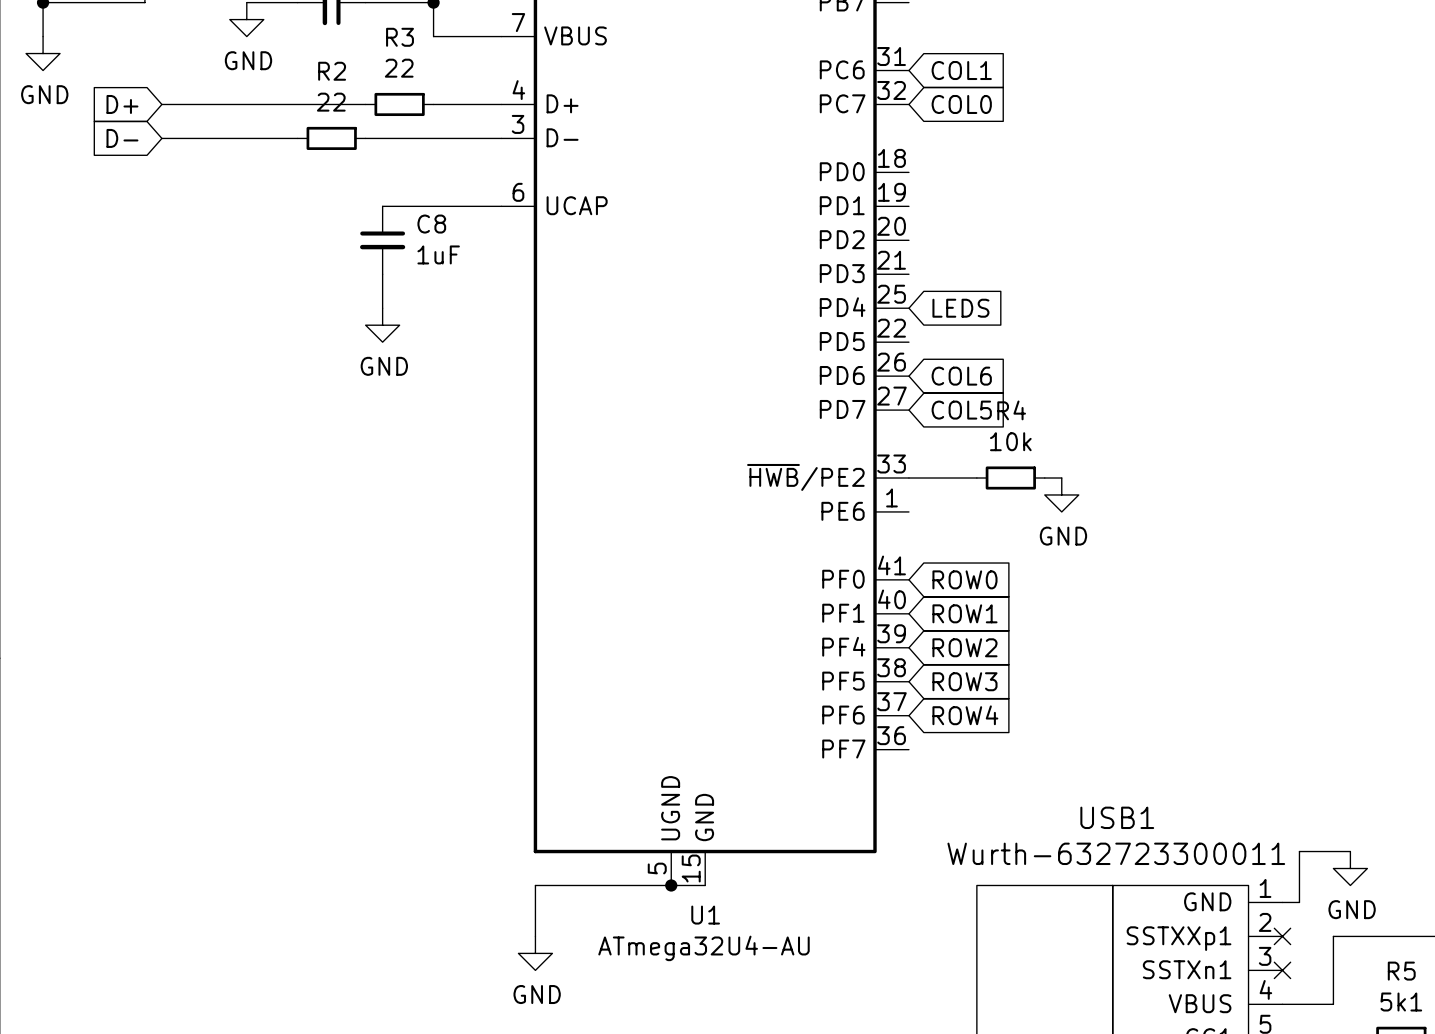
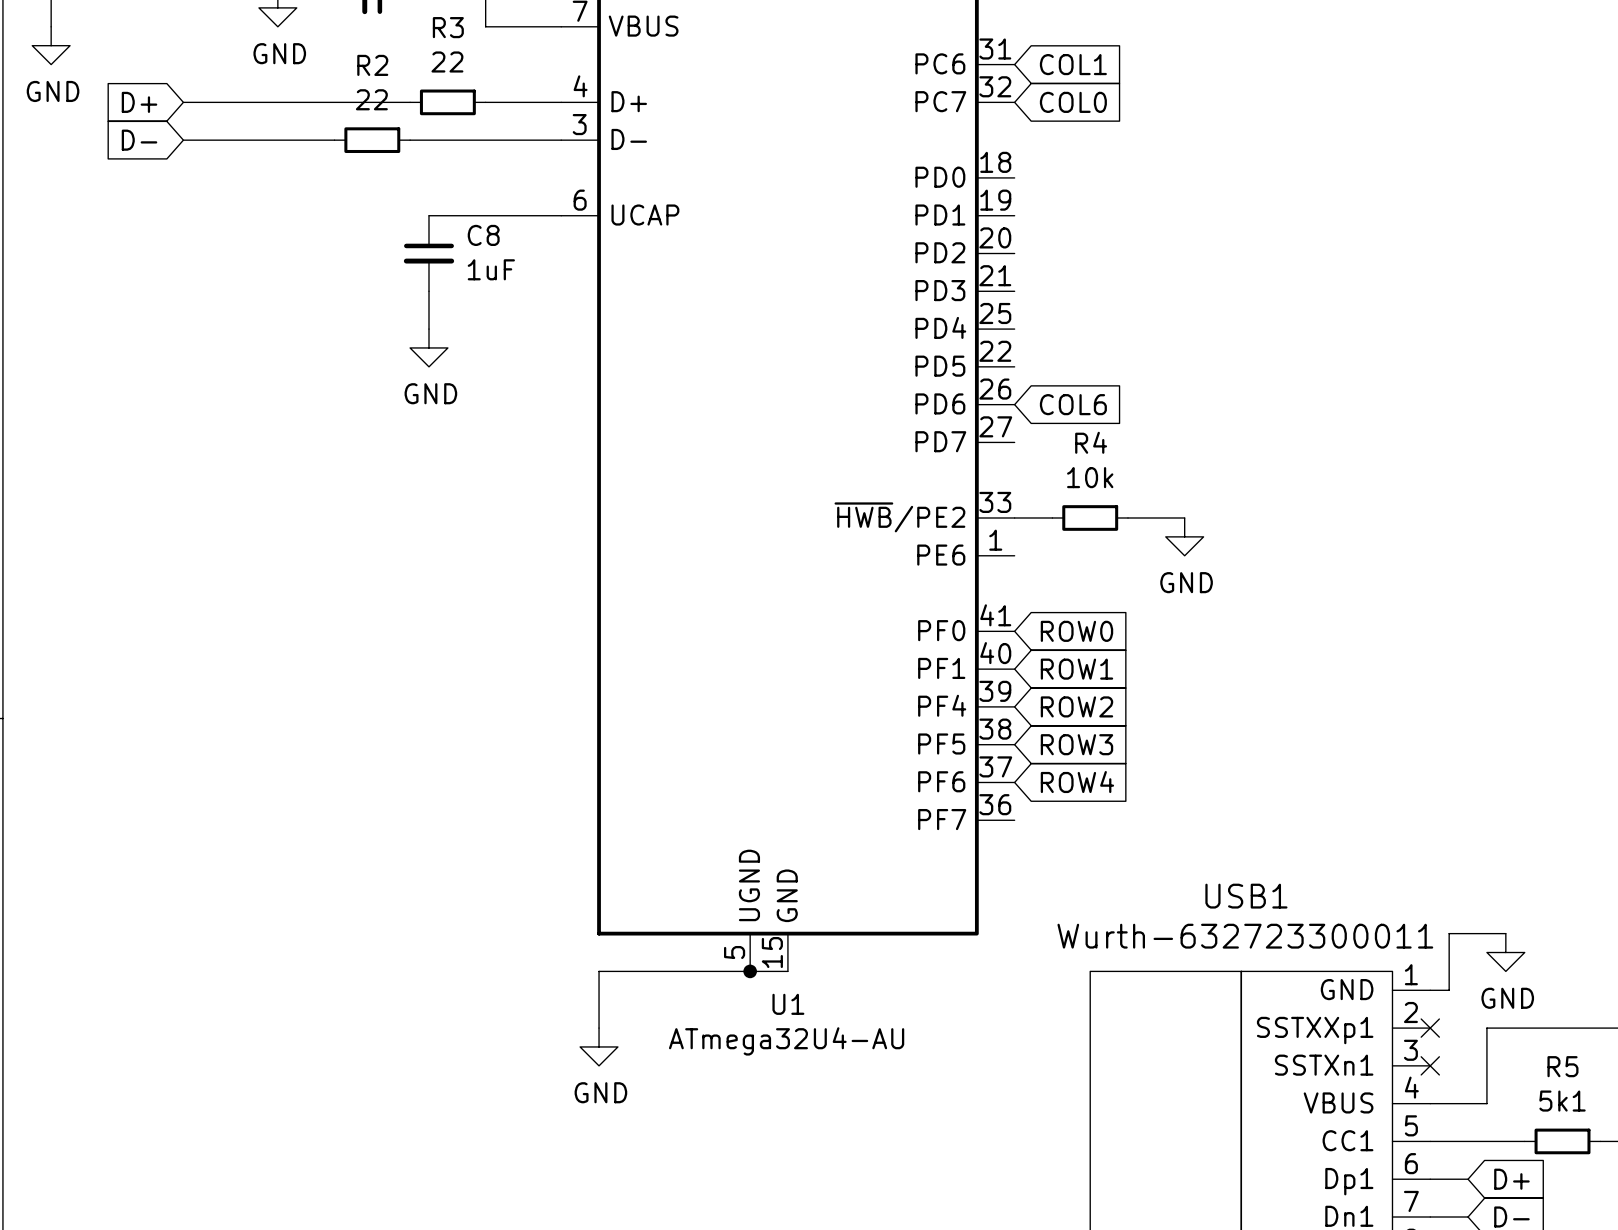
global label: LEDS (960, 308) -> none
global label: COL5 (961, 410) -> none
wire: (942, 478) (976, 478) -> (1128, 517) (1165, 517)
R4 position: (1010, 478) -> (1090, 517)

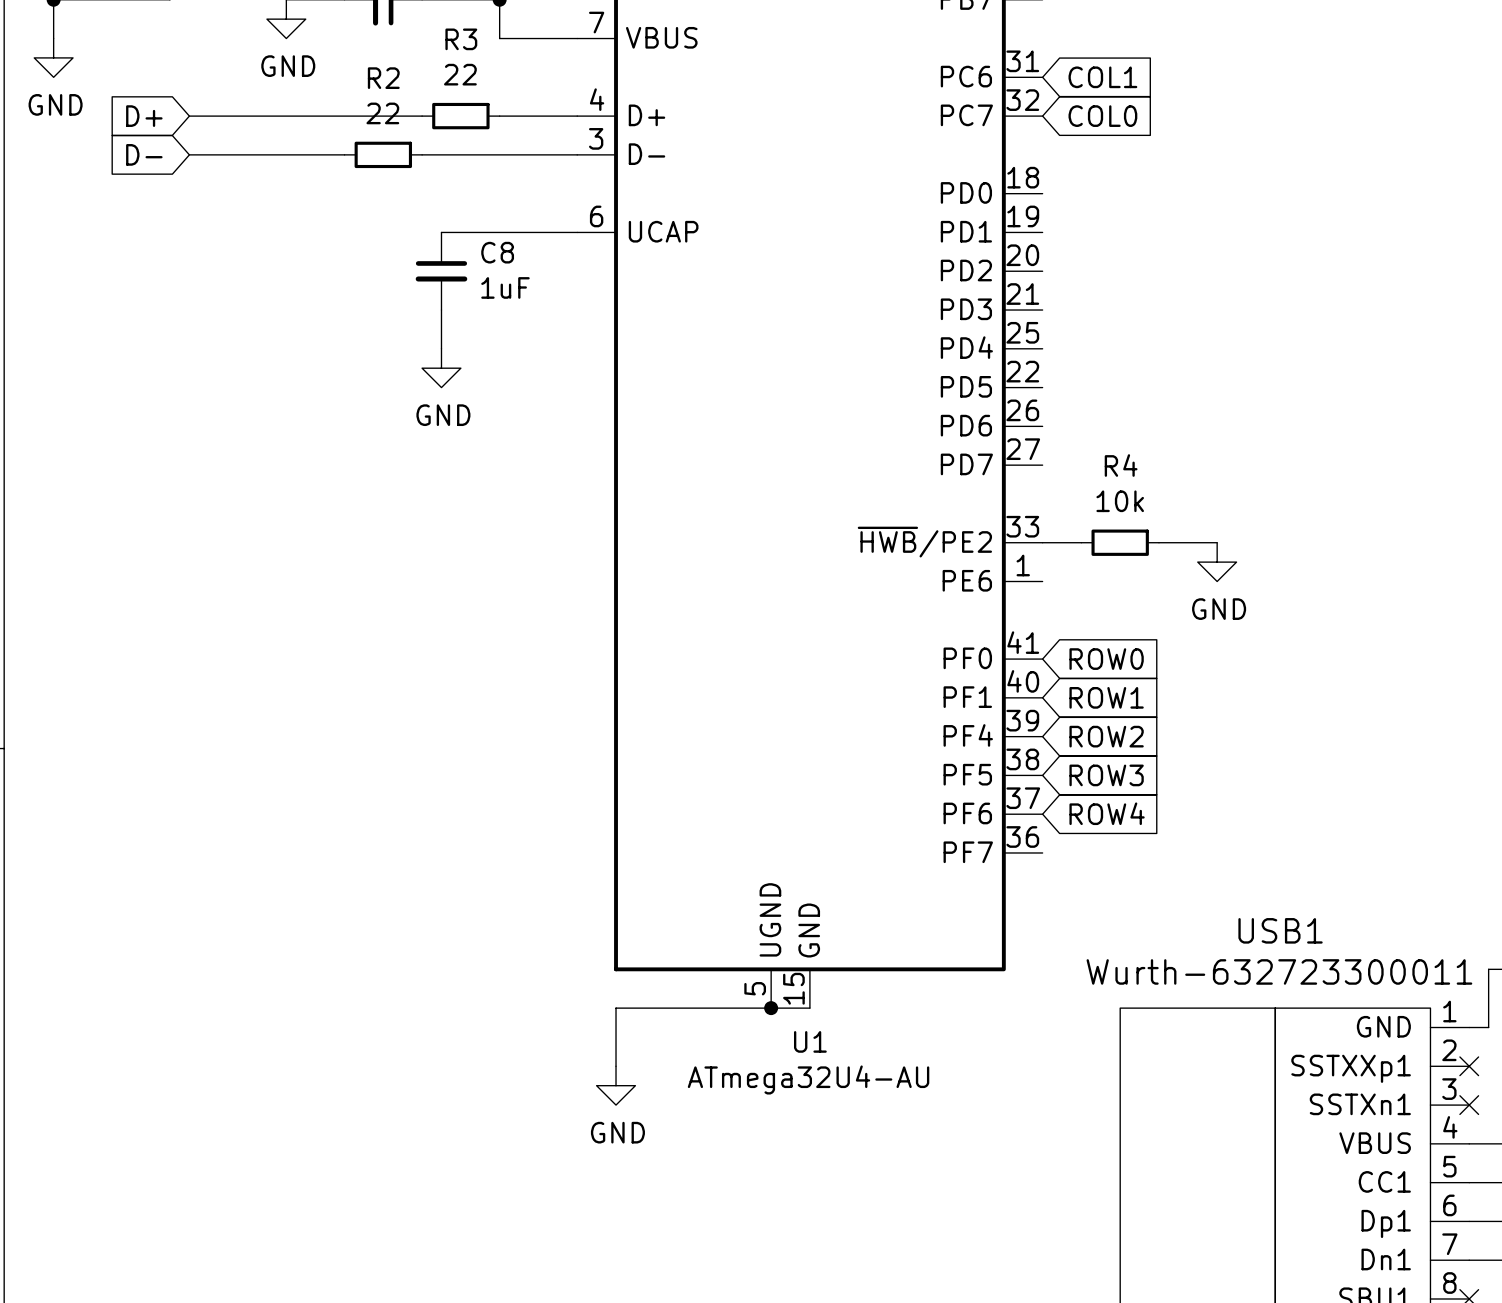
global label: COL6 (1073, 404) -> none

